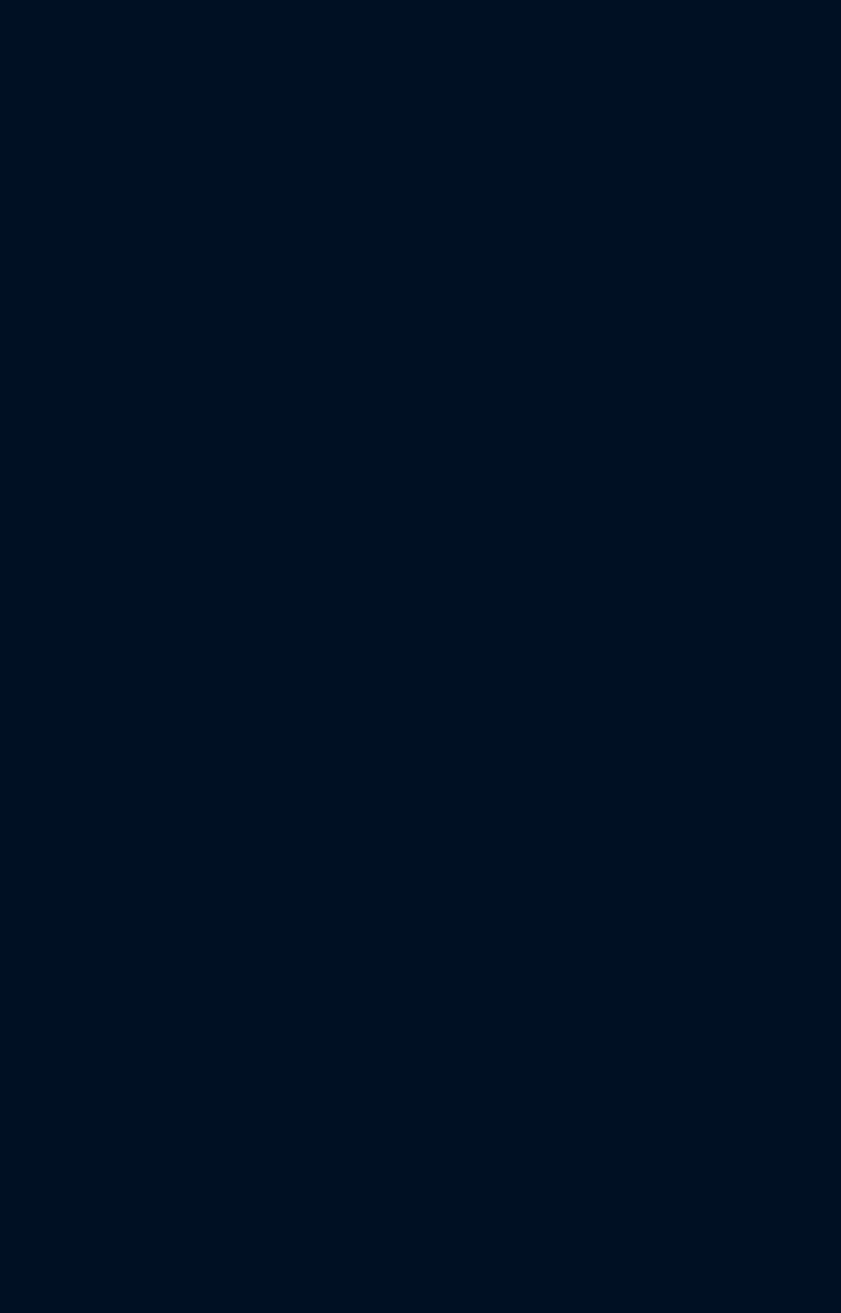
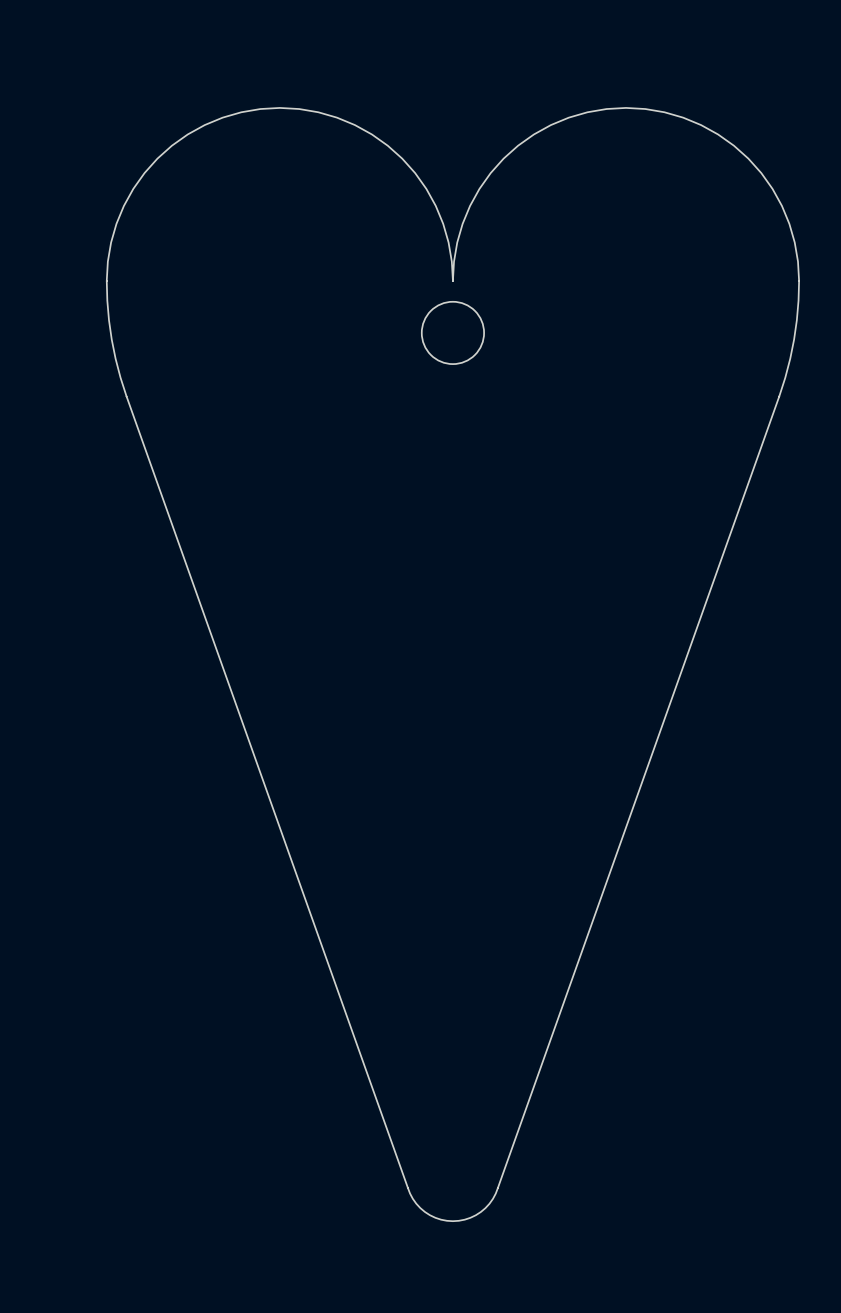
board edge: none -> (106, 281) (111, 339) (126, 396) (410, 1193) (420, 1208) (435, 1217) (452, 1221) (470, 1217) (480, 1211) (489, 1203) (497, 1187) (785, 377) (796, 320) (799, 281) (798, 261) (789, 223) (781, 205) (761, 173) (748, 158) (718, 134) (701, 125) (664, 112) (645, 109) (606, 109) (568, 117) (550, 125) (533, 134) (503, 158) (490, 173) (470, 205) (457, 242) (452, 281) (448, 242) (435, 205) (415, 173) (387, 145) (354, 125) (337, 117) (299, 109) (260, 109) (222, 117) (204, 125) (171, 145) (157, 158) (133, 188) (123, 205) (111, 242) (106, 281)
round board edge: none -> [420, 300, 485, 365]

